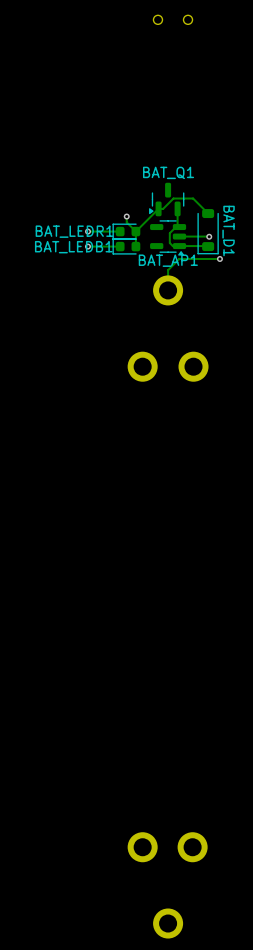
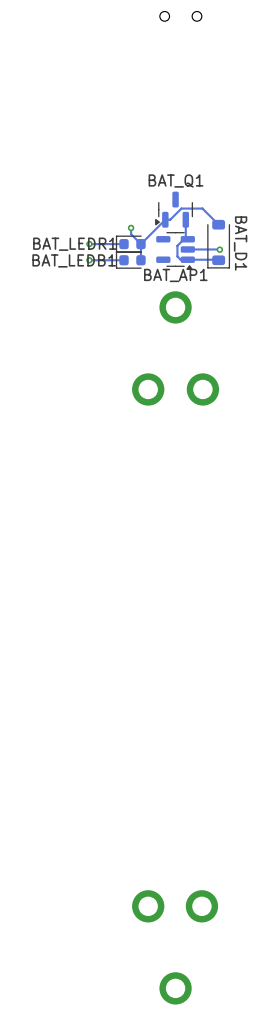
track: (219, 258) (179, 258) (168, 270) (168, 290) -> none
via: (219, 258) -> none

